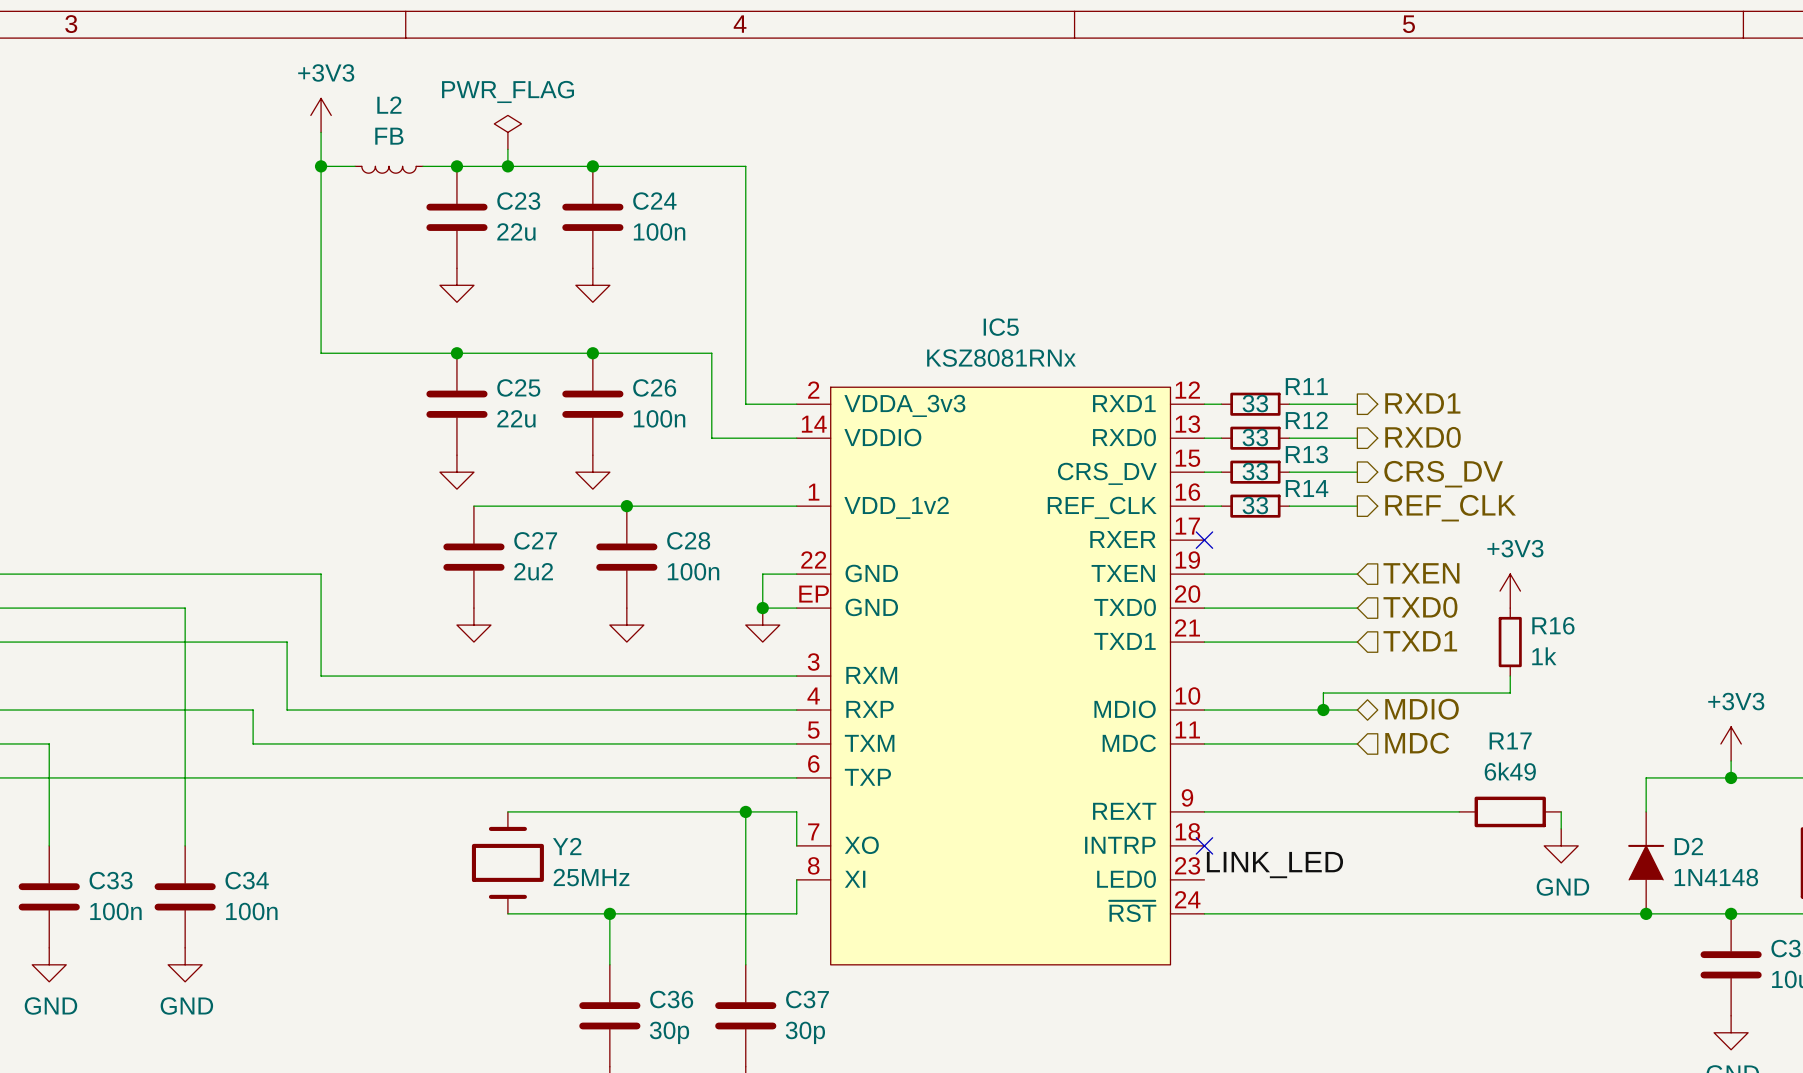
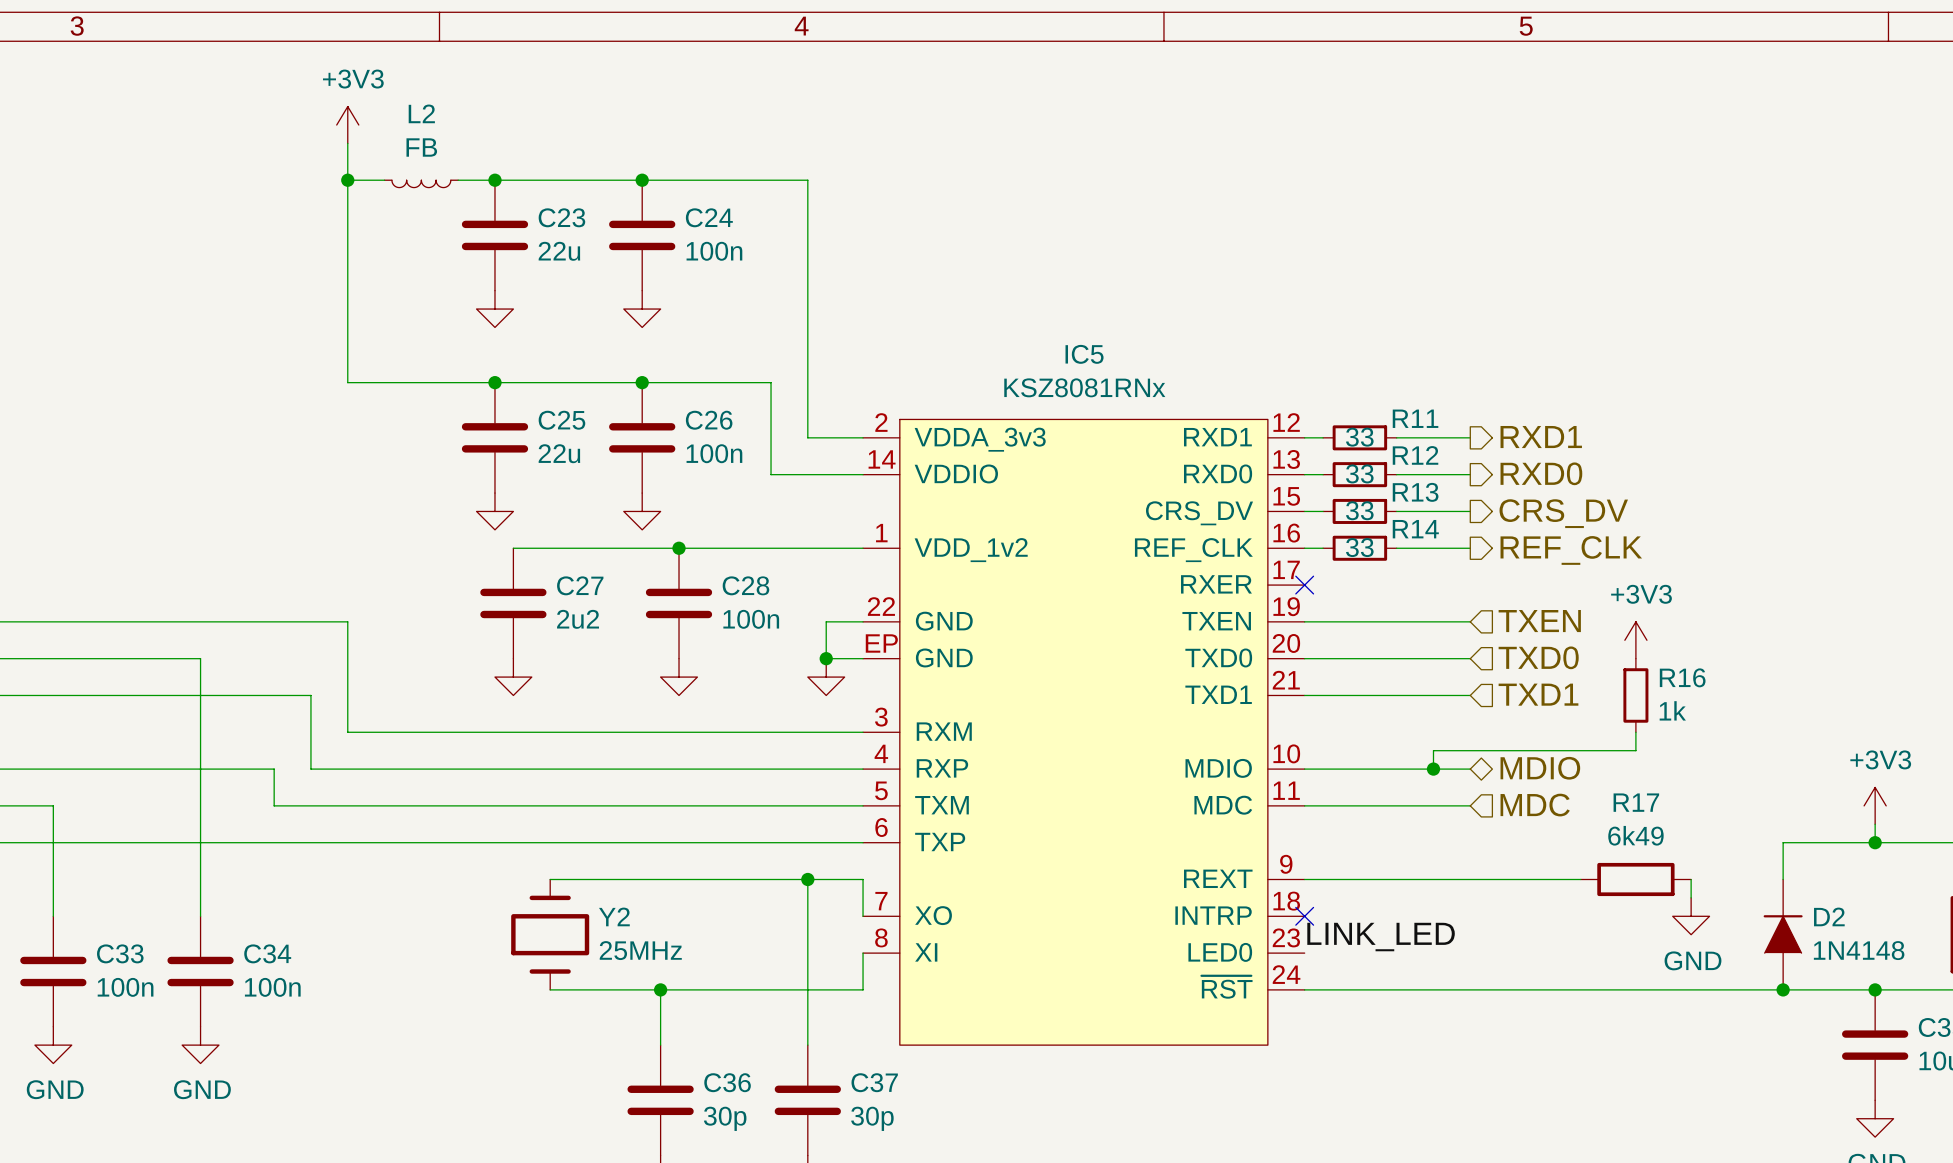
power symbol: PWR_FLAG (507, 132) -> none
wire: (507, 149) (507, 166) -> none
junction: (507, 166) -> none

